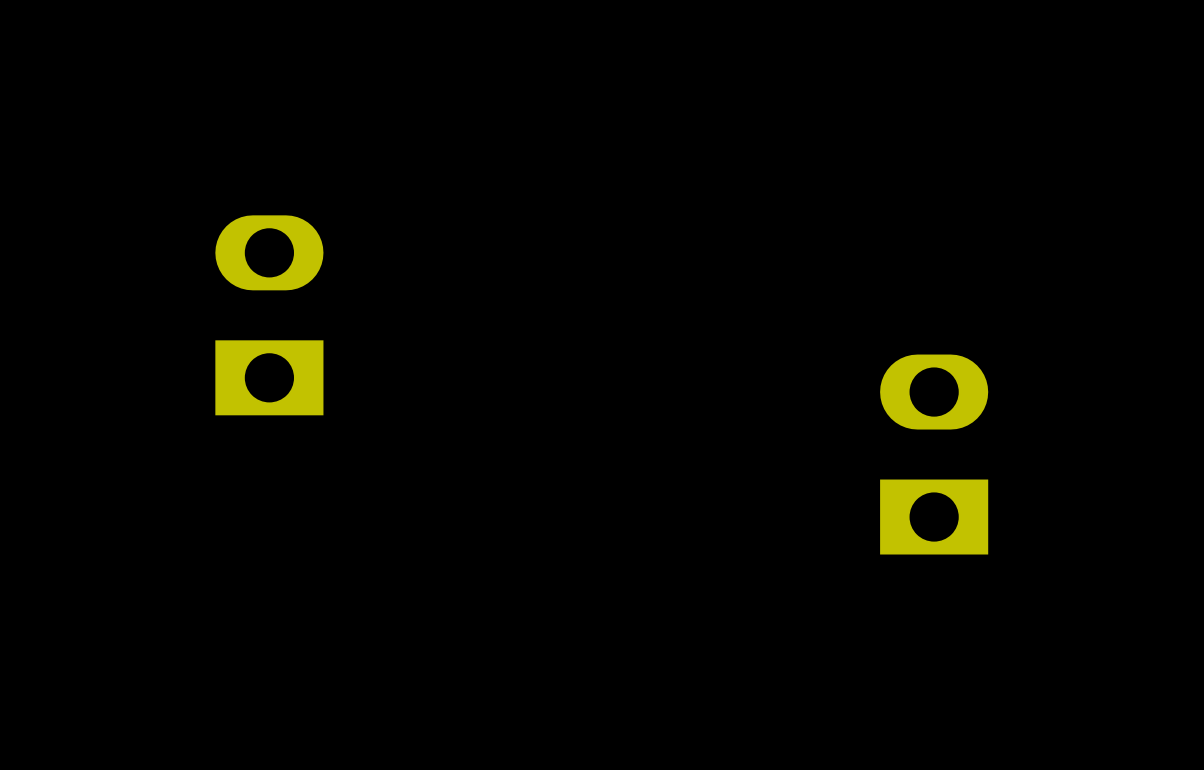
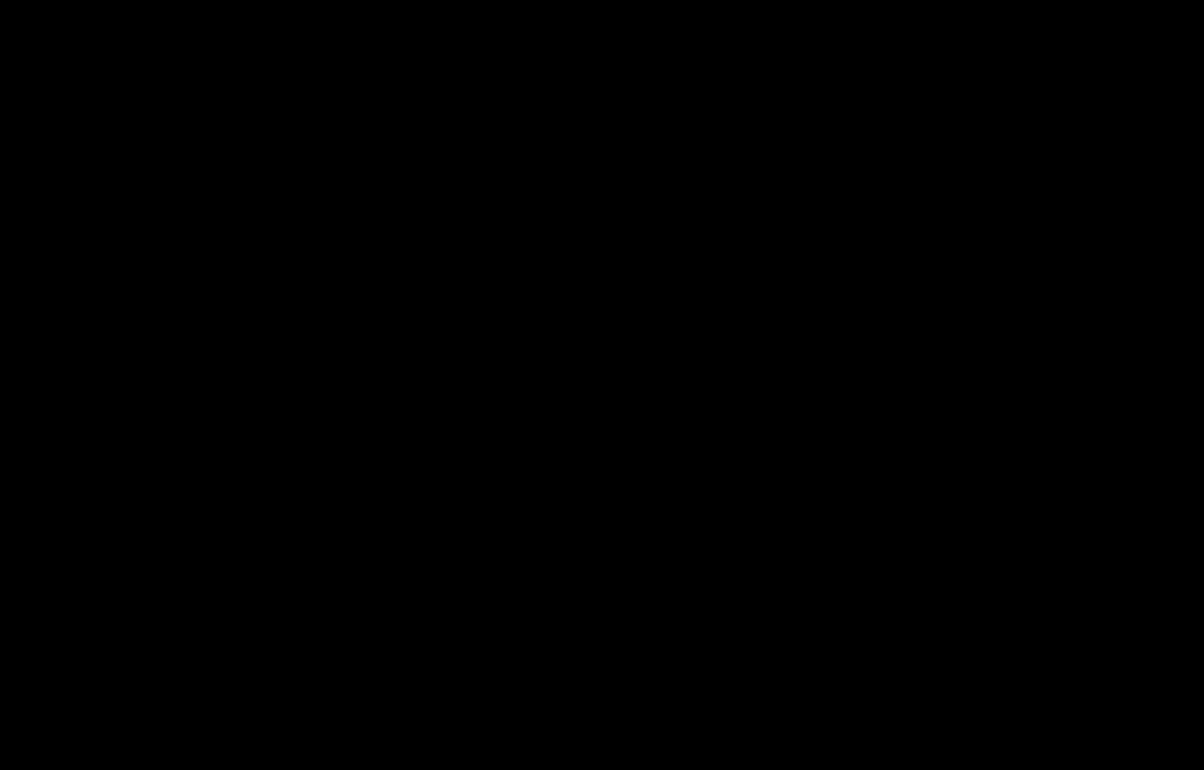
part: (269, 315) -> none
part: (934, 454) -> none

